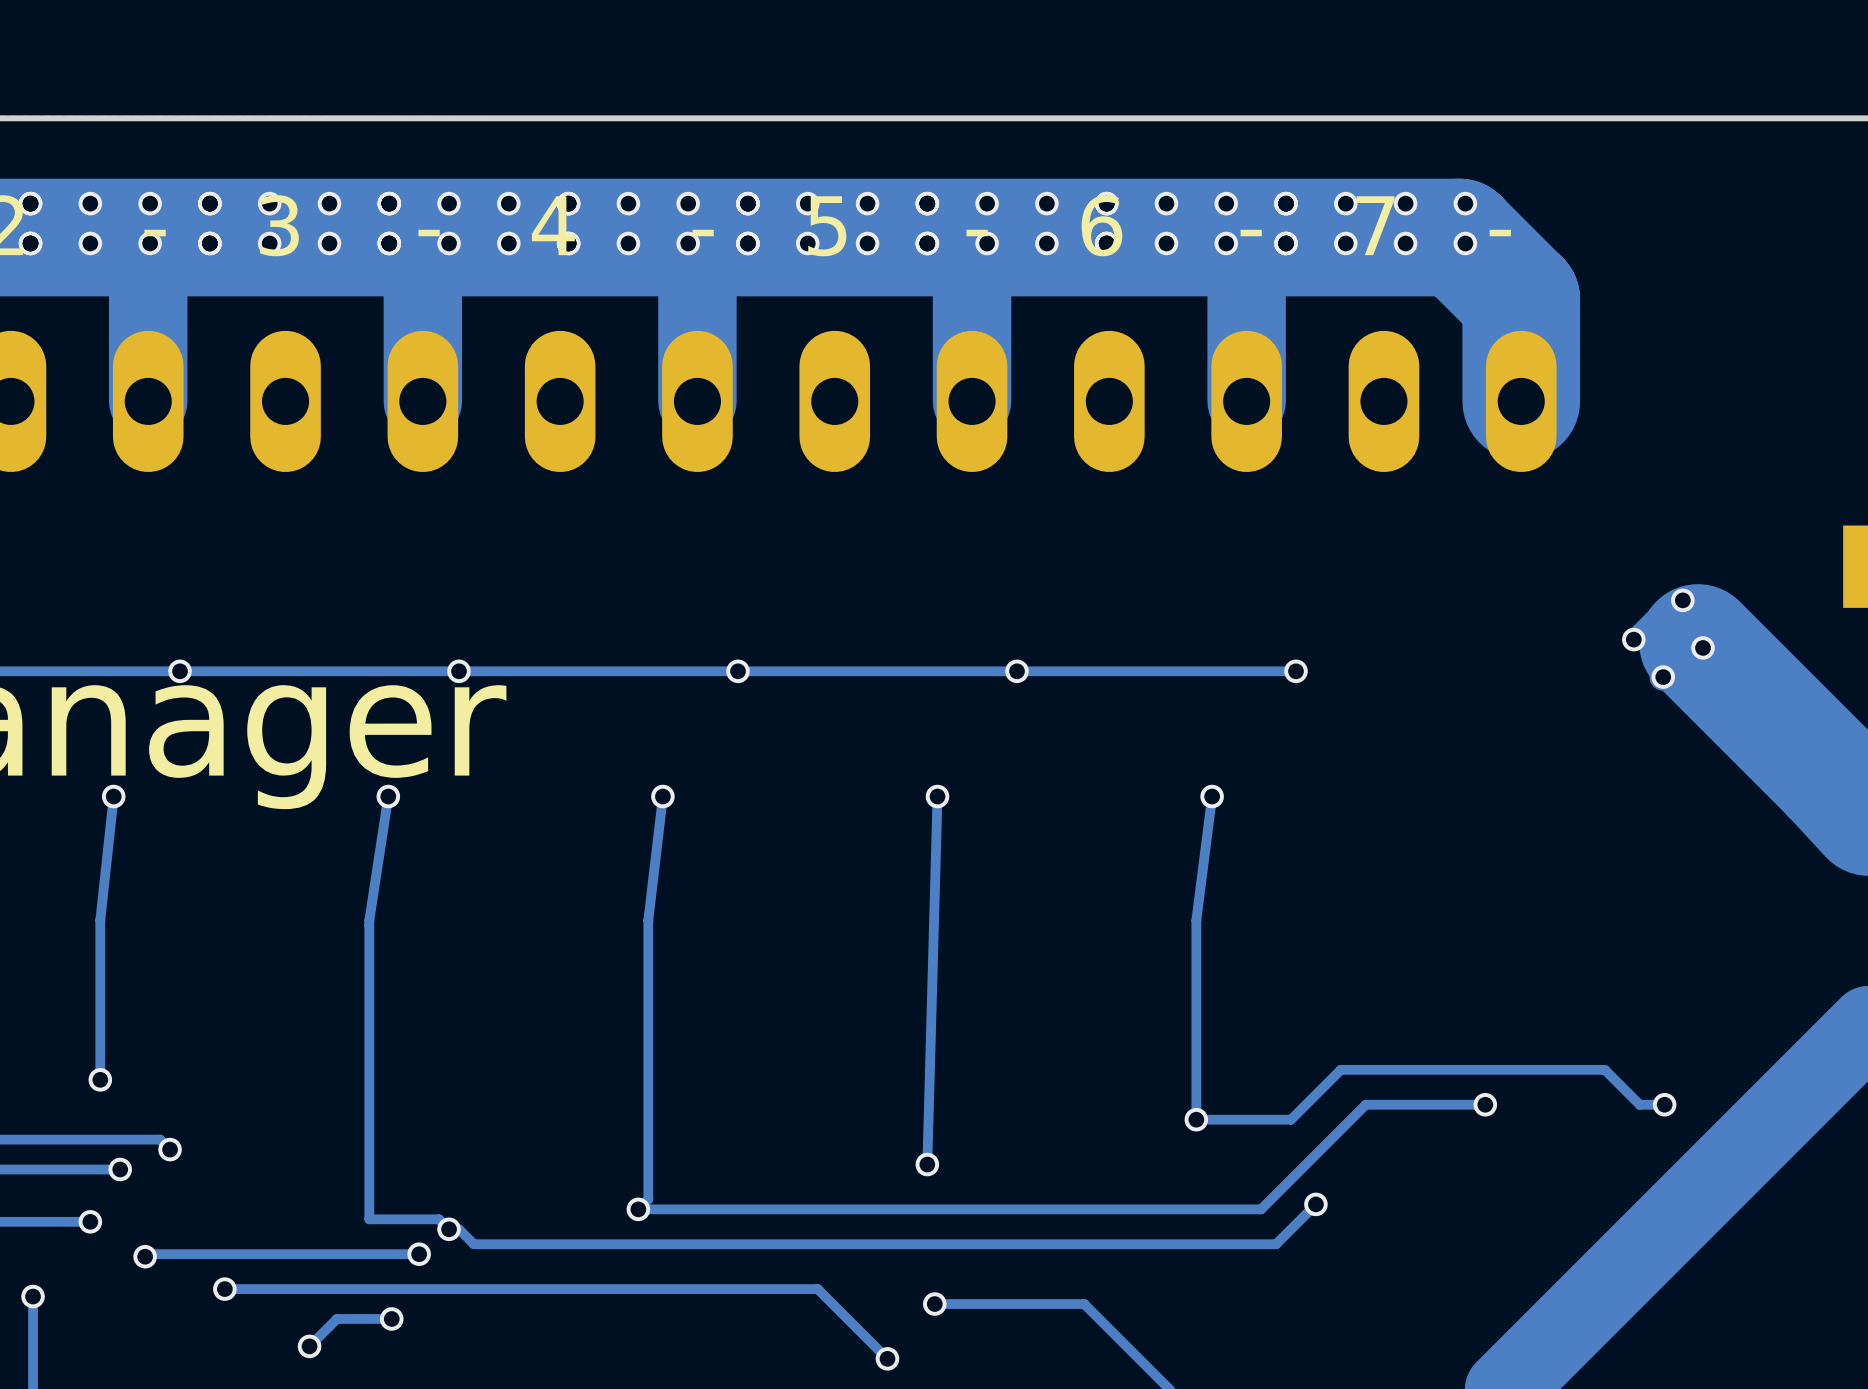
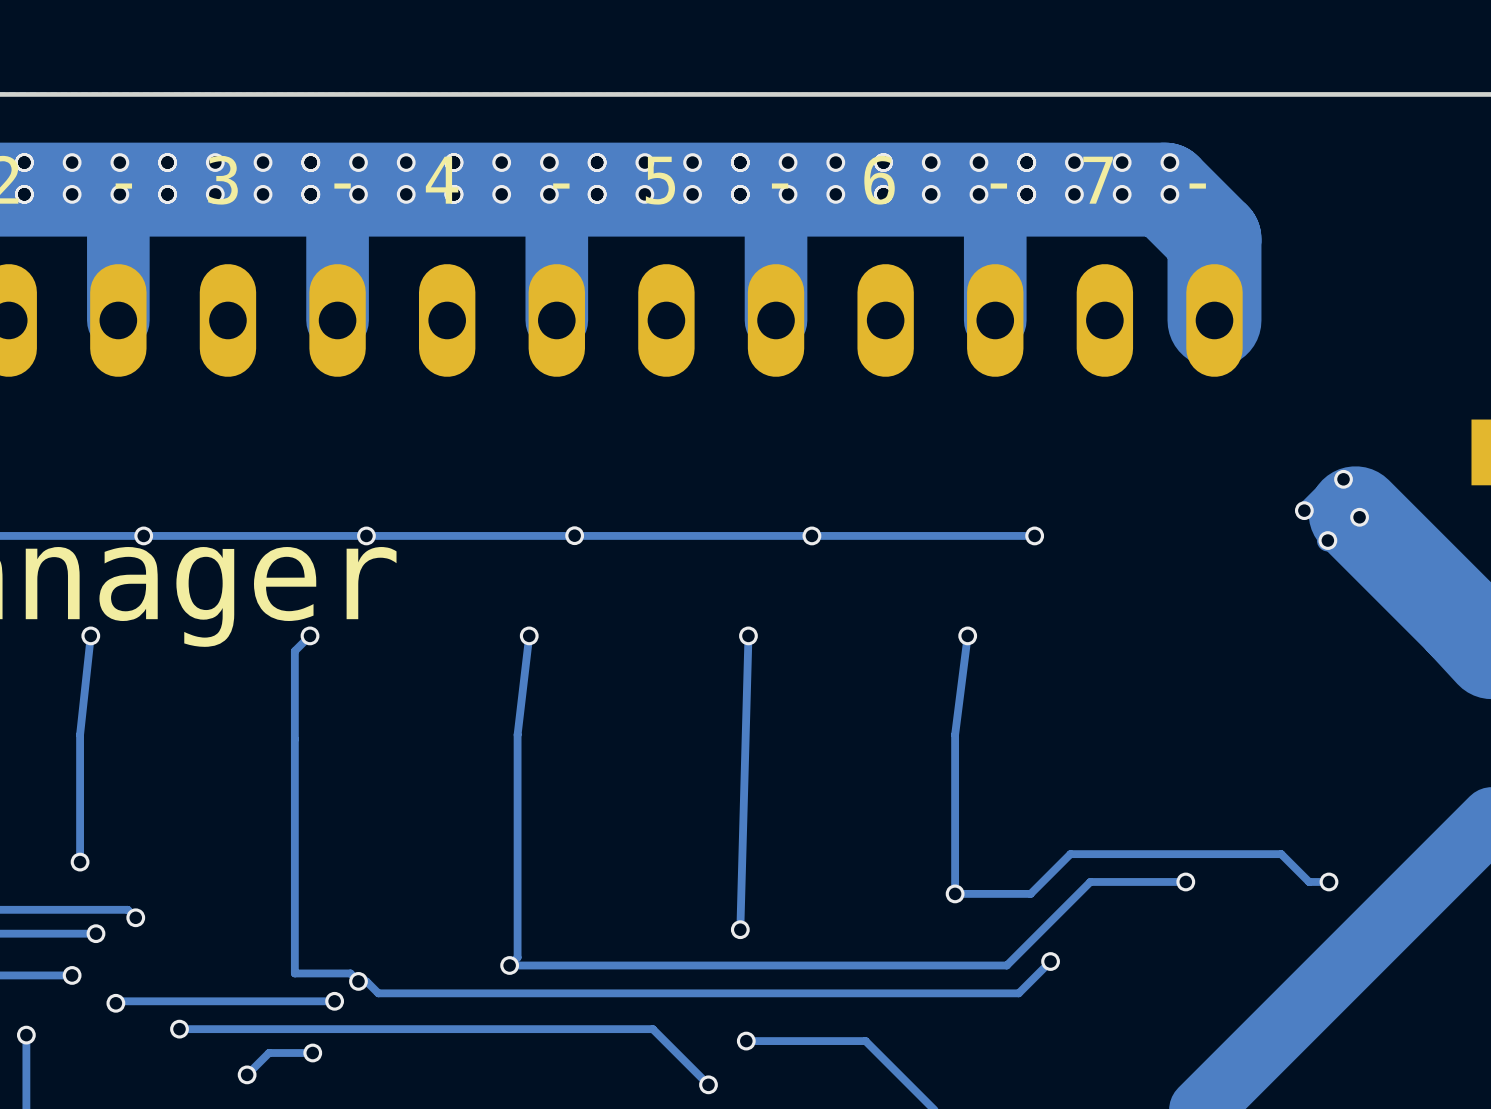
via position: (738, 671) -> (574, 535)
track: (388, 796) (369, 920) -> (310, 635) (294, 651) (294, 734)

